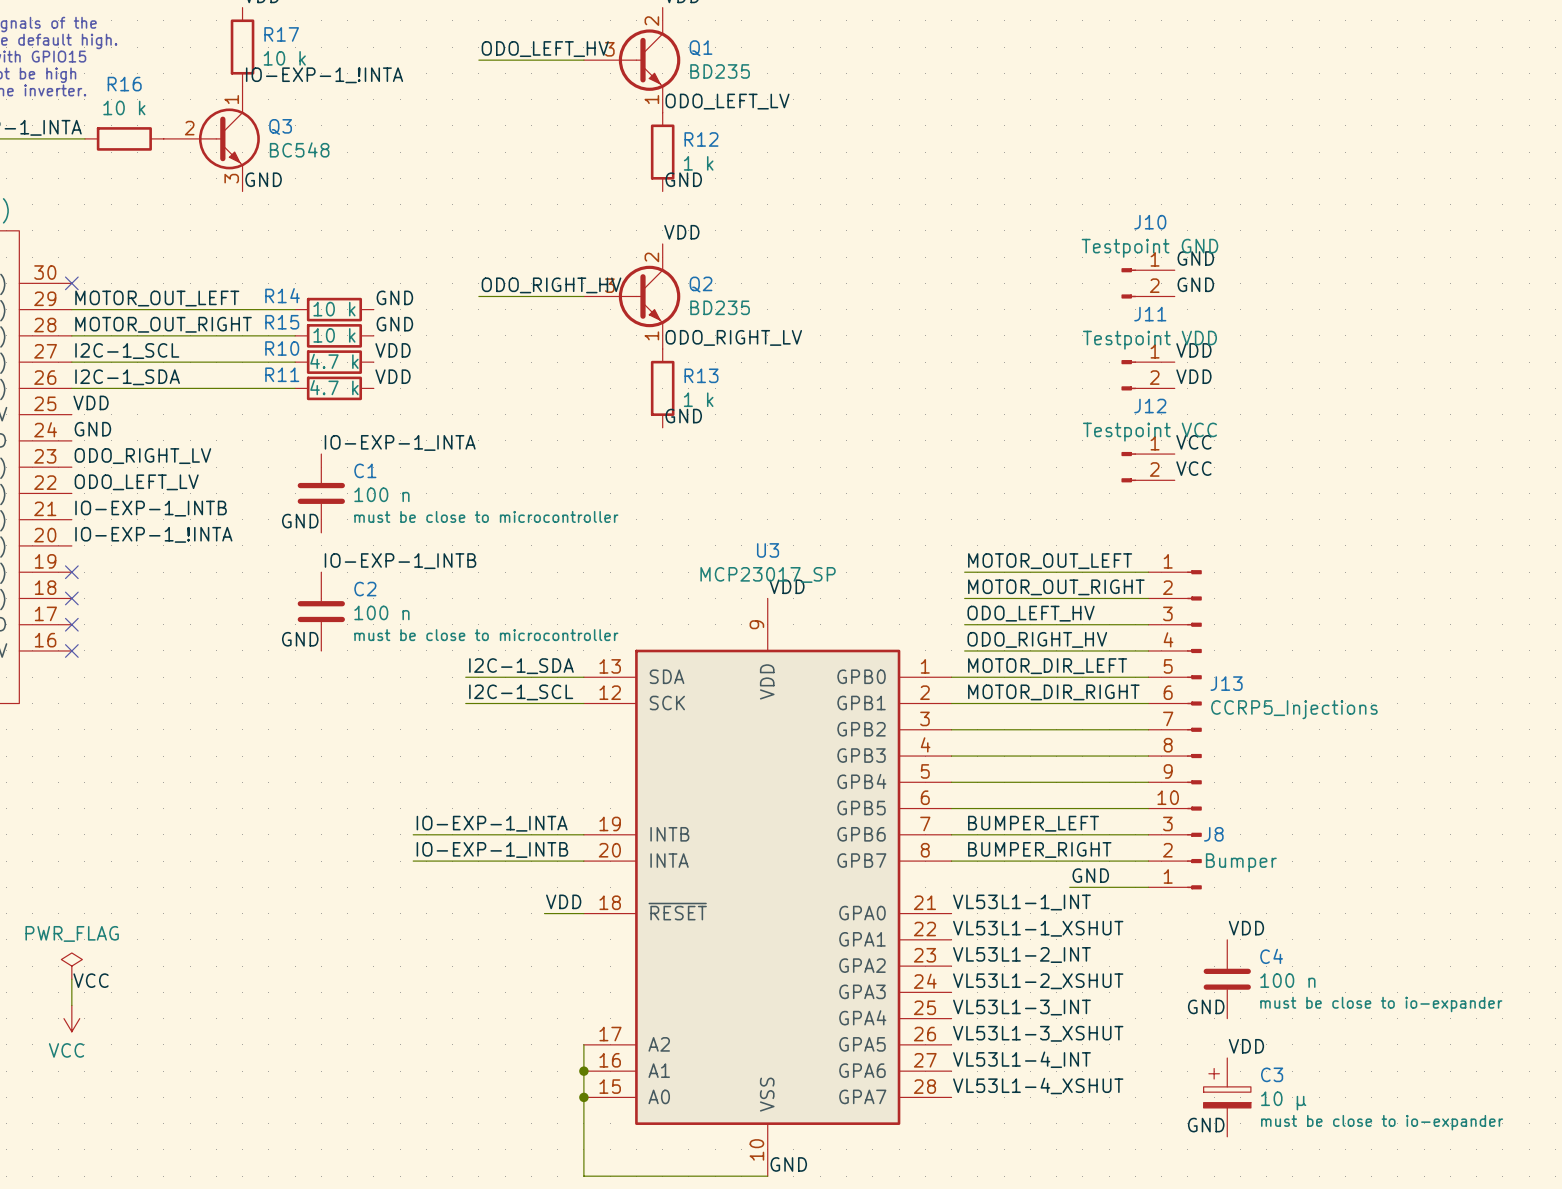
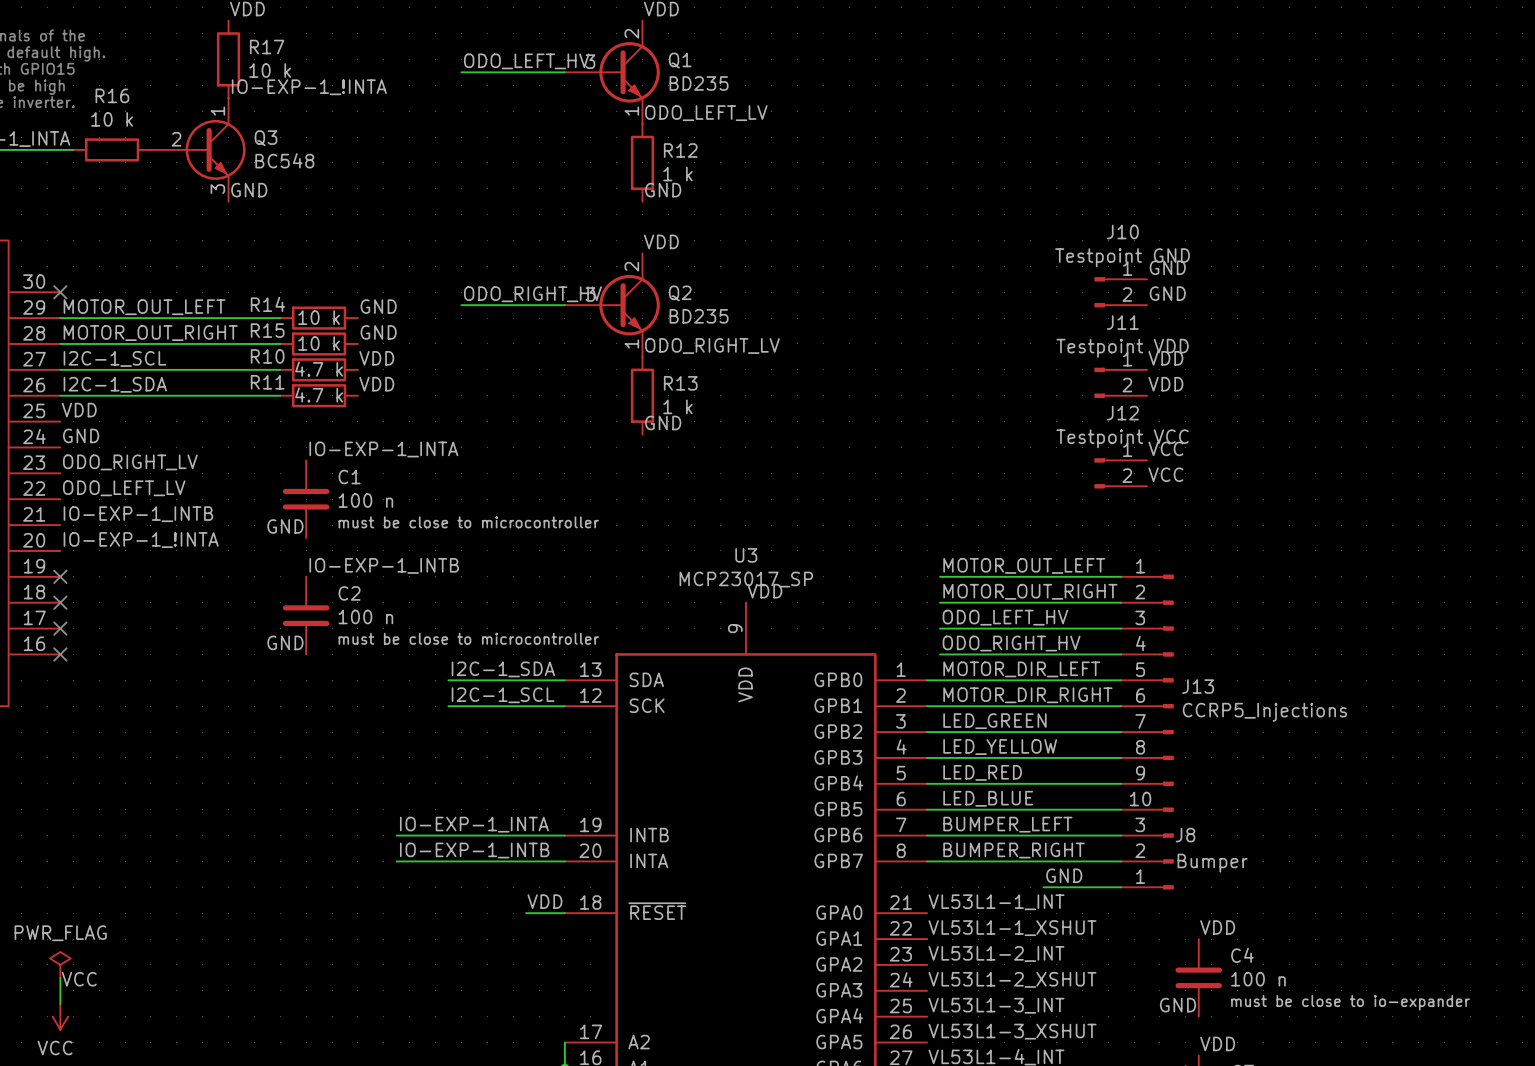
label: none -> LED_GREEN (994, 721)
label: none -> LED_YELLOW (1000, 747)
label: none -> LED_RED (982, 772)
label: none -> LED_BLUE (988, 798)

